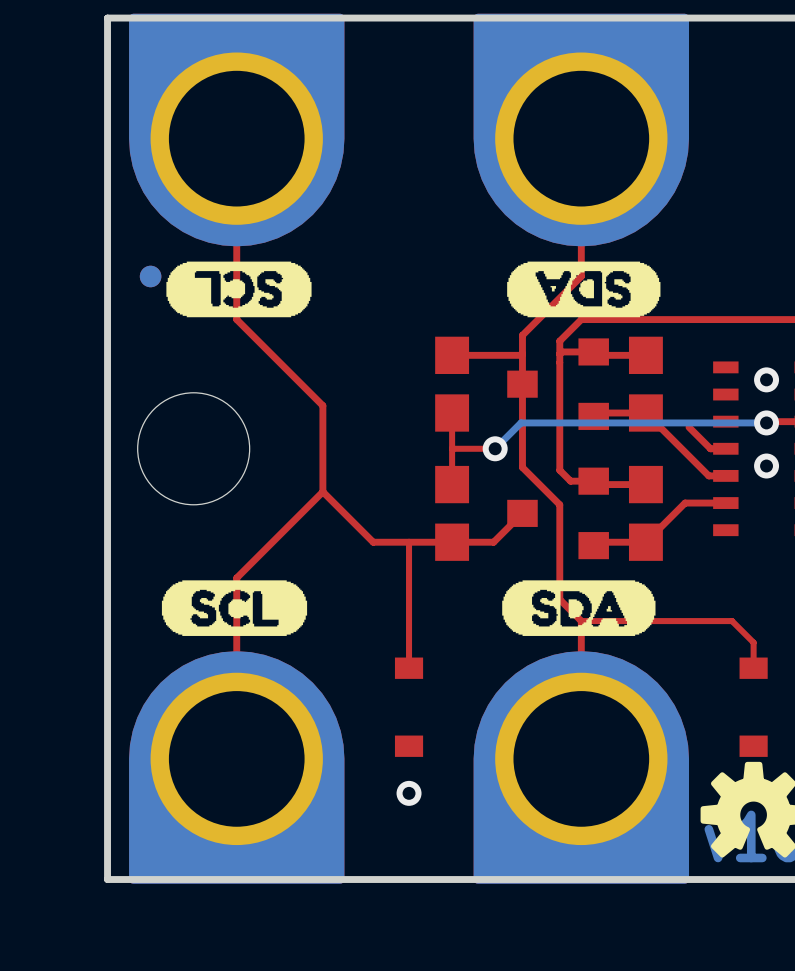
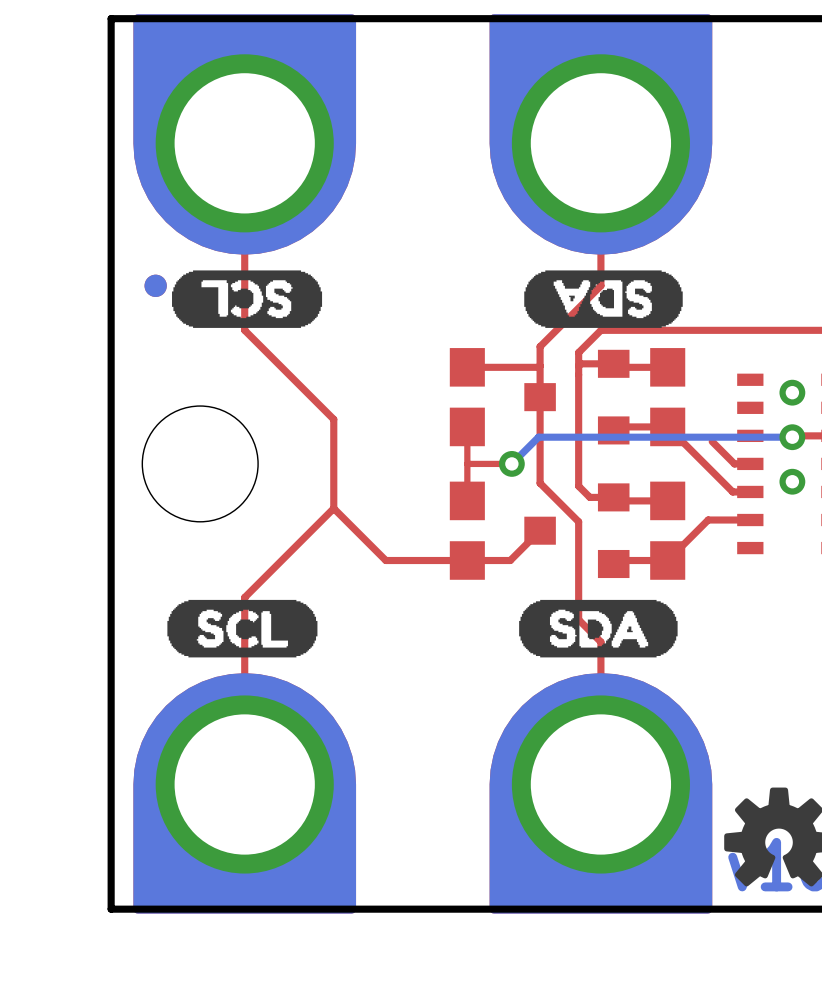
top track: (409, 542) (409, 668) -> none
top track: (581, 621) (732, 621) (753, 642) (753, 668) -> none
part: (409, 707) -> none
part: (753, 707) -> none
via: (409, 793) -> none

